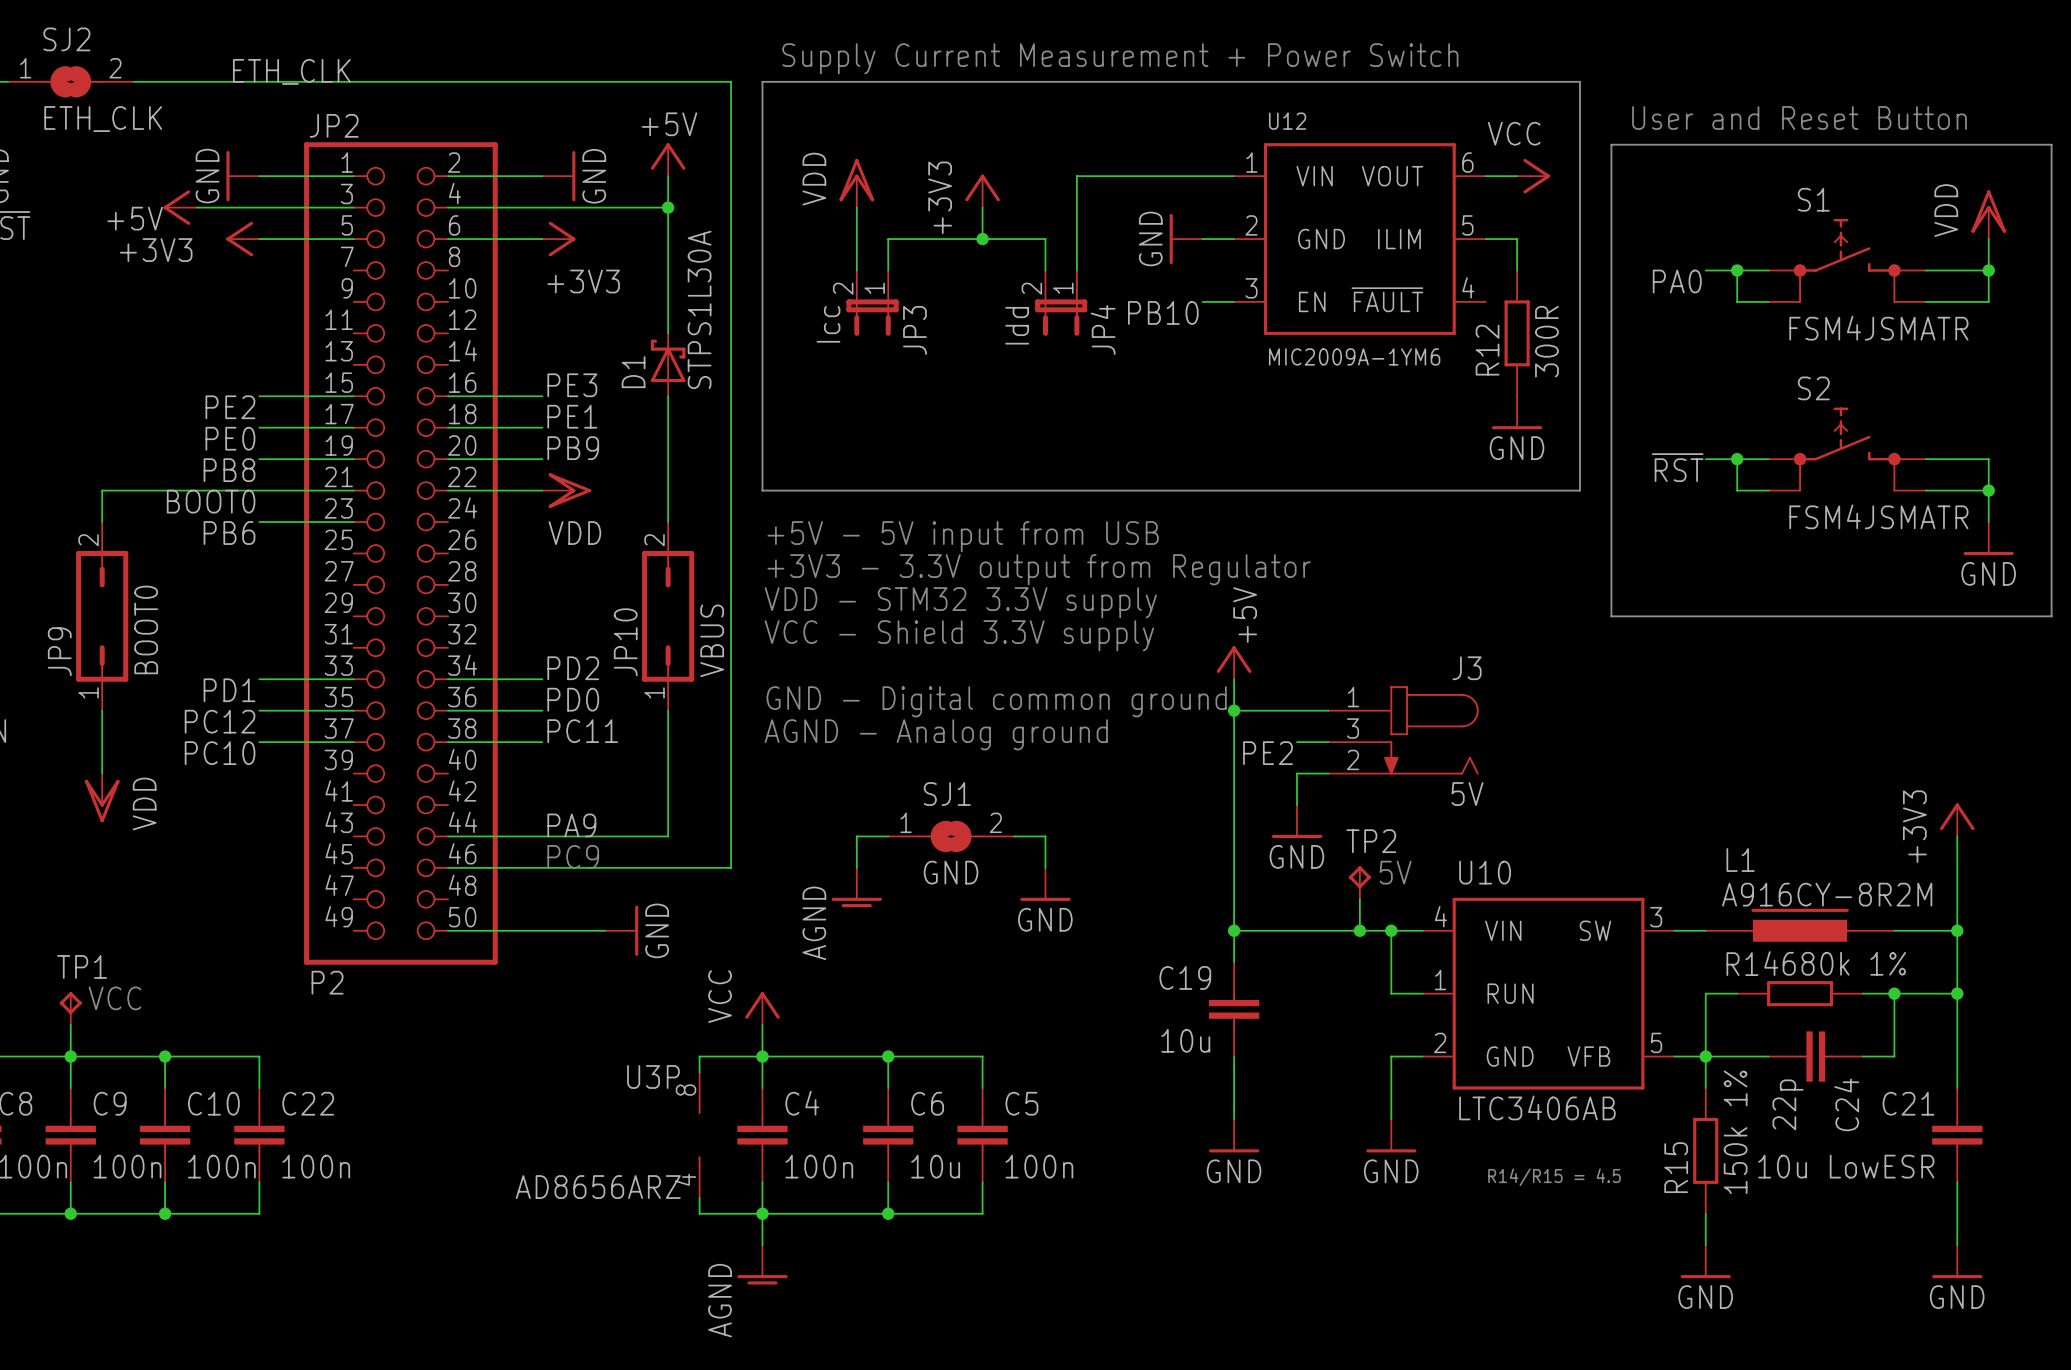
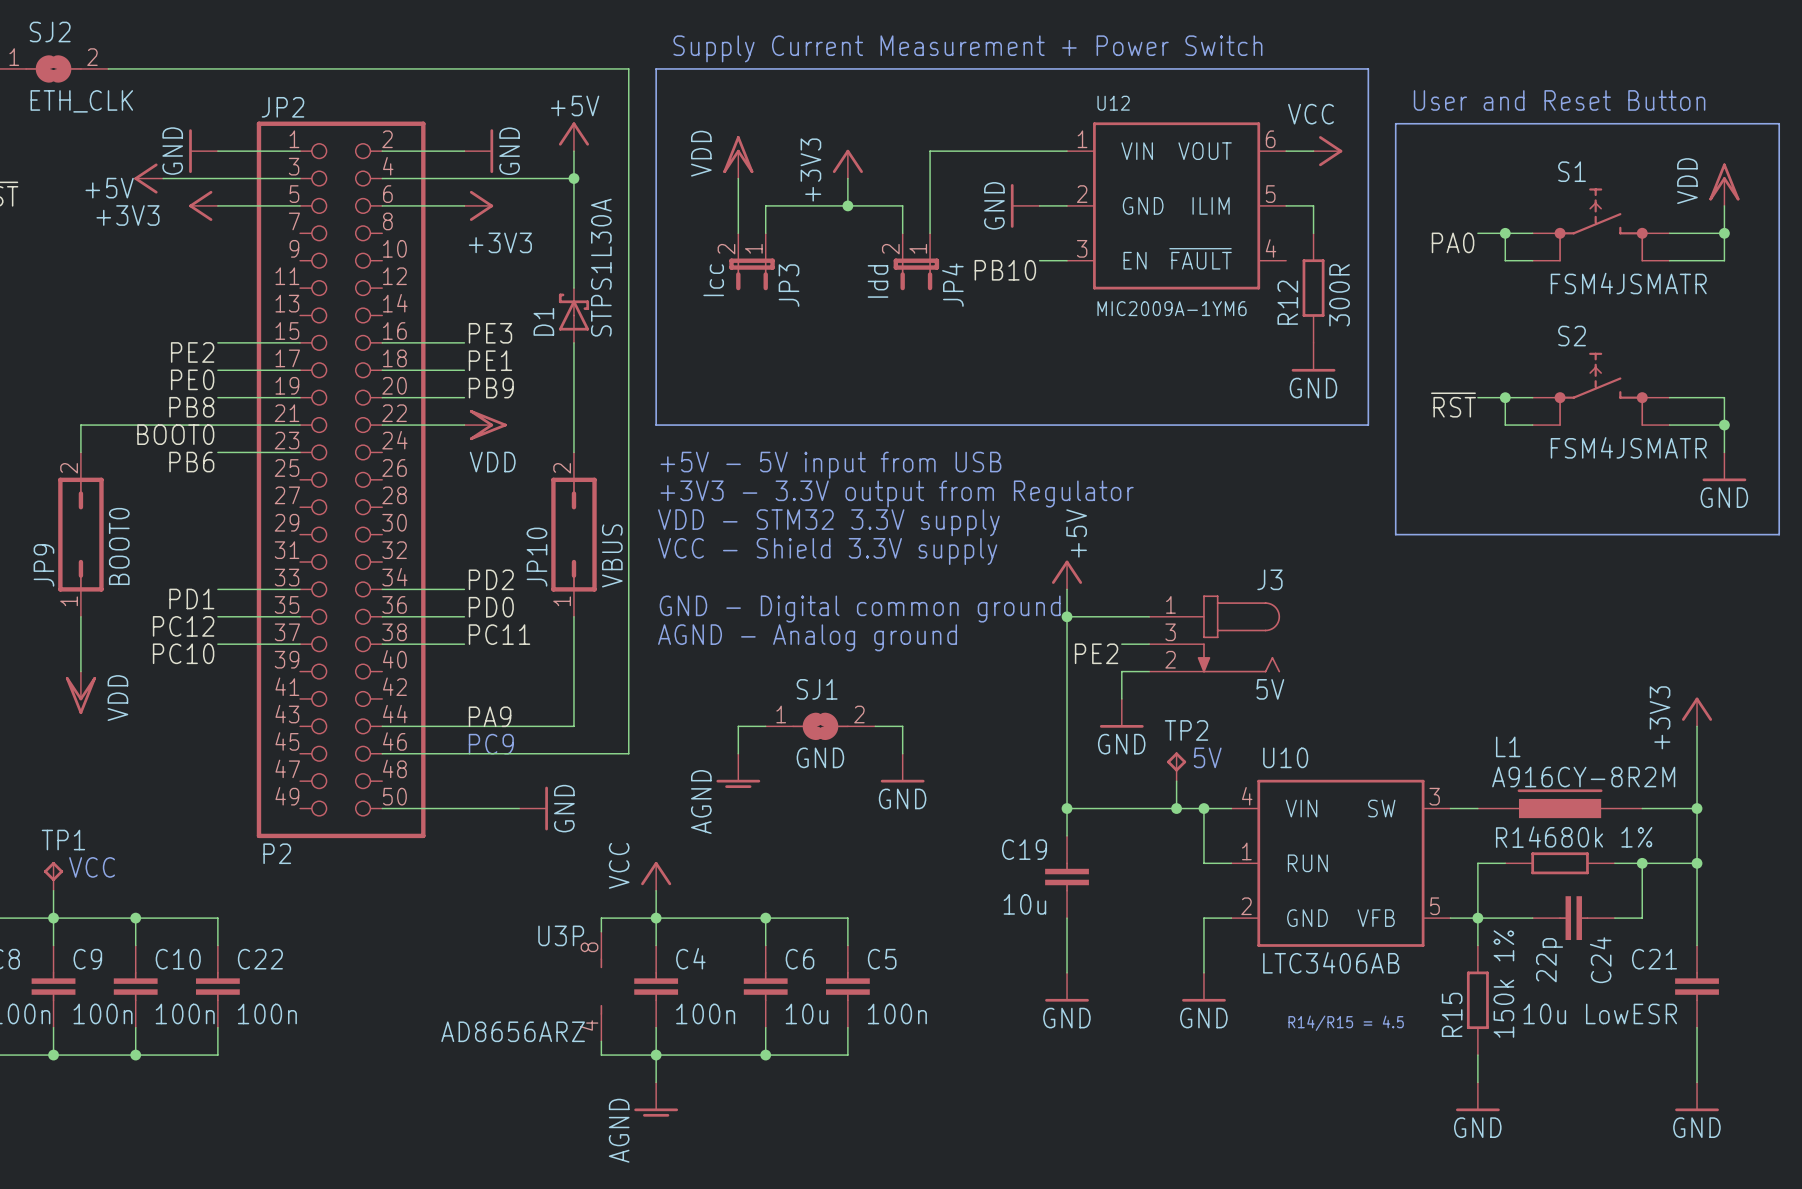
label: ETH_CLK (291, 71) -> none

